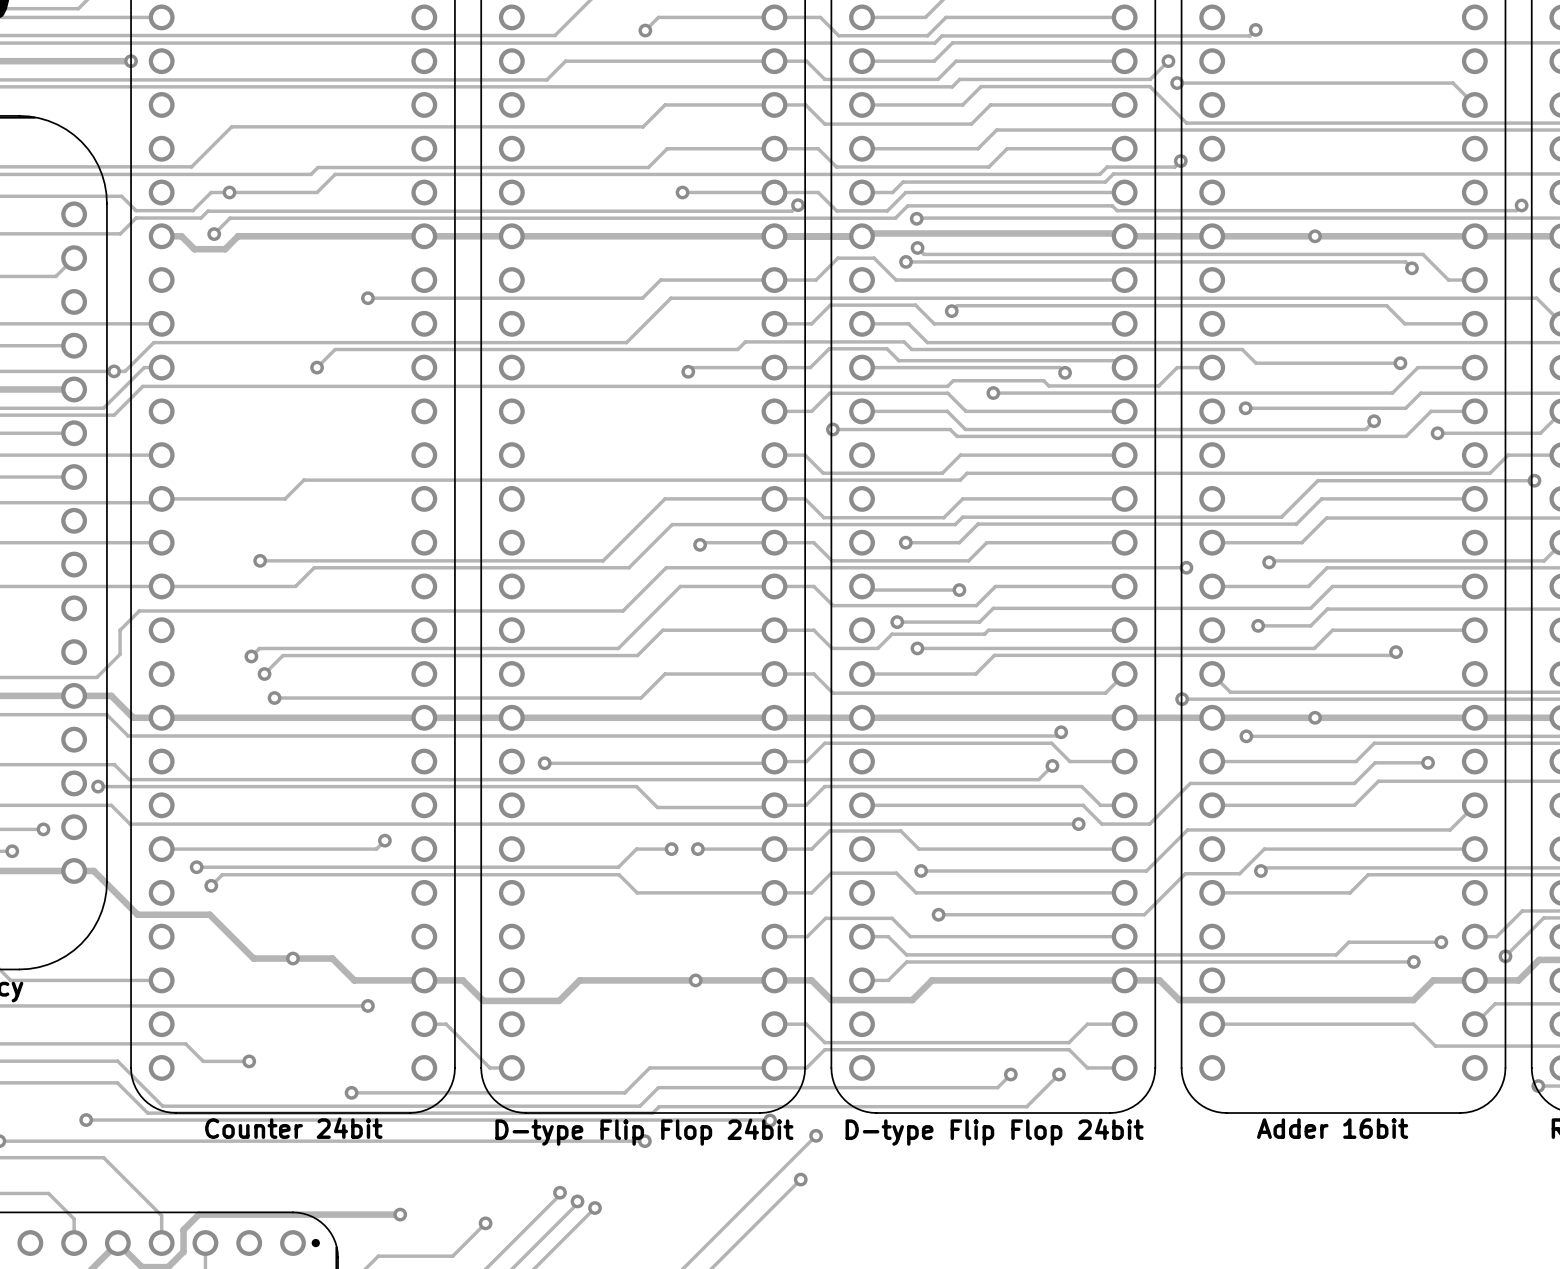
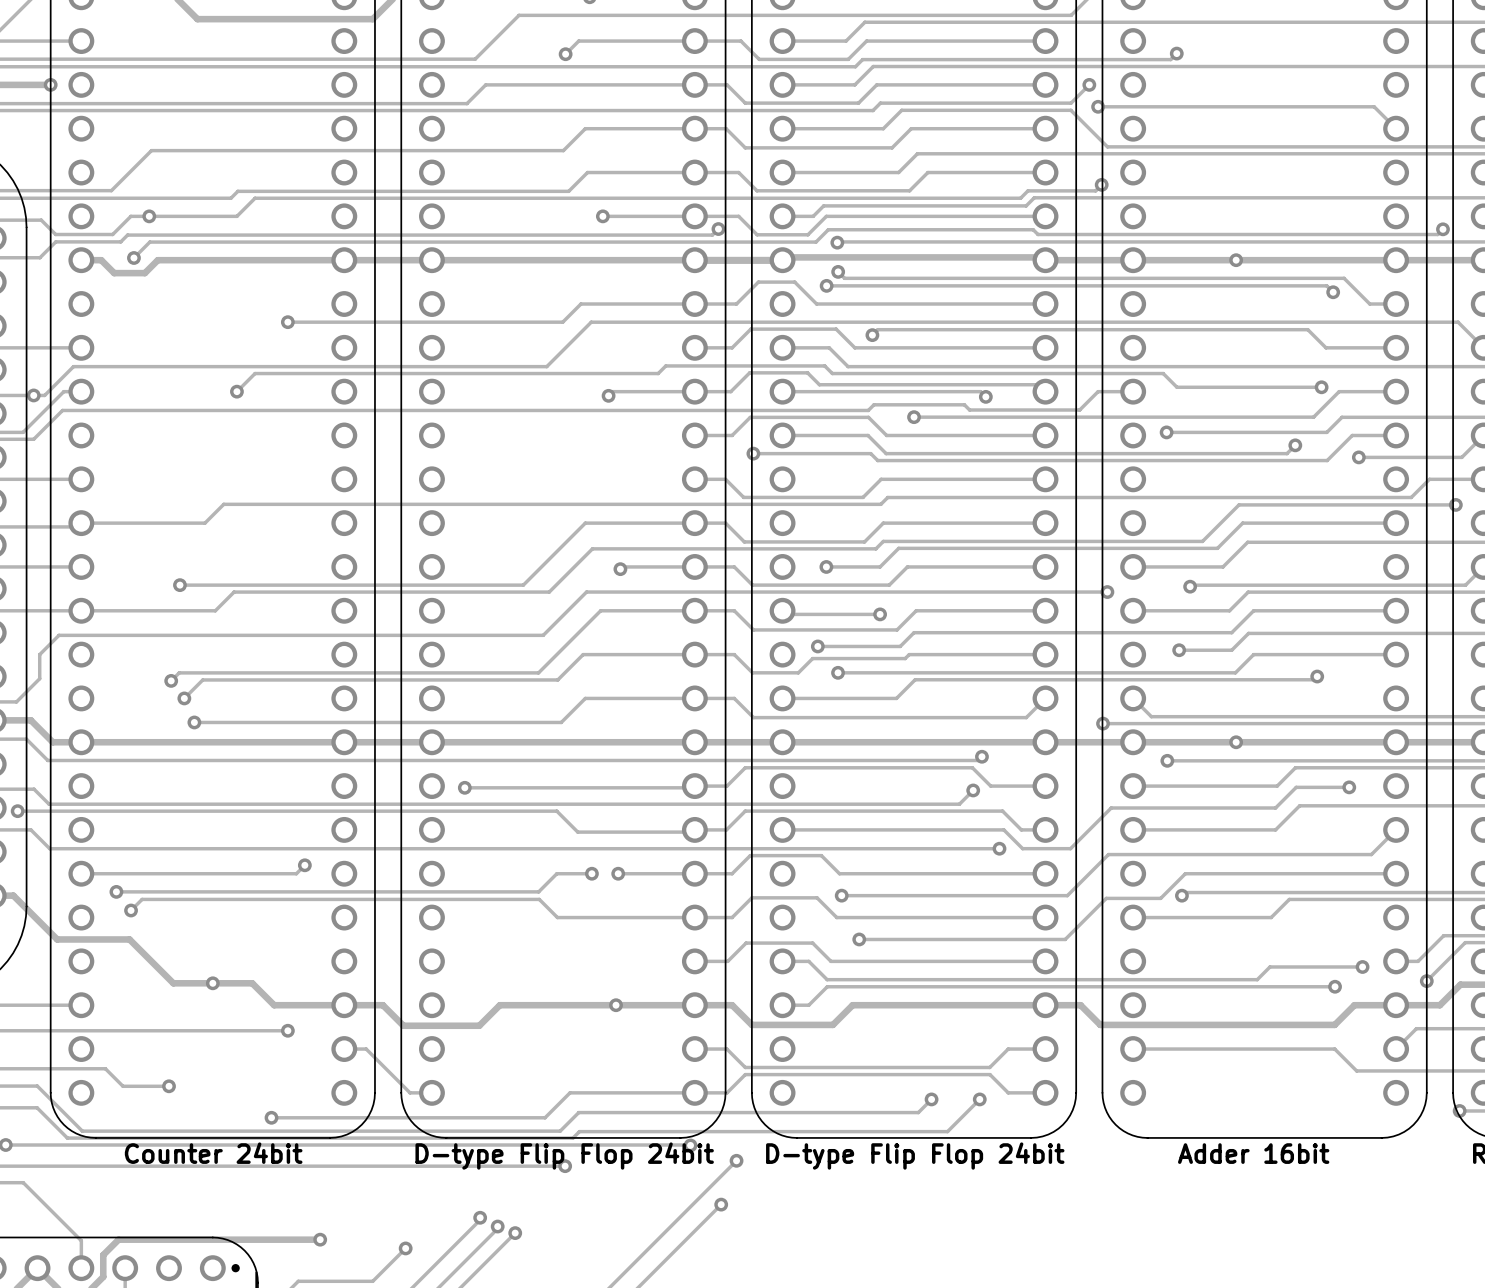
part text: none -> D-type Flip Flop 24bit (564, 1156)
part text: none -> D-type Flip Flop 24bit (915, 1156)
part text: D-type Flip Flop 24bit (644, 1132) -> none
part text: D-type Flip Flop 24bit (994, 1132) -> none

